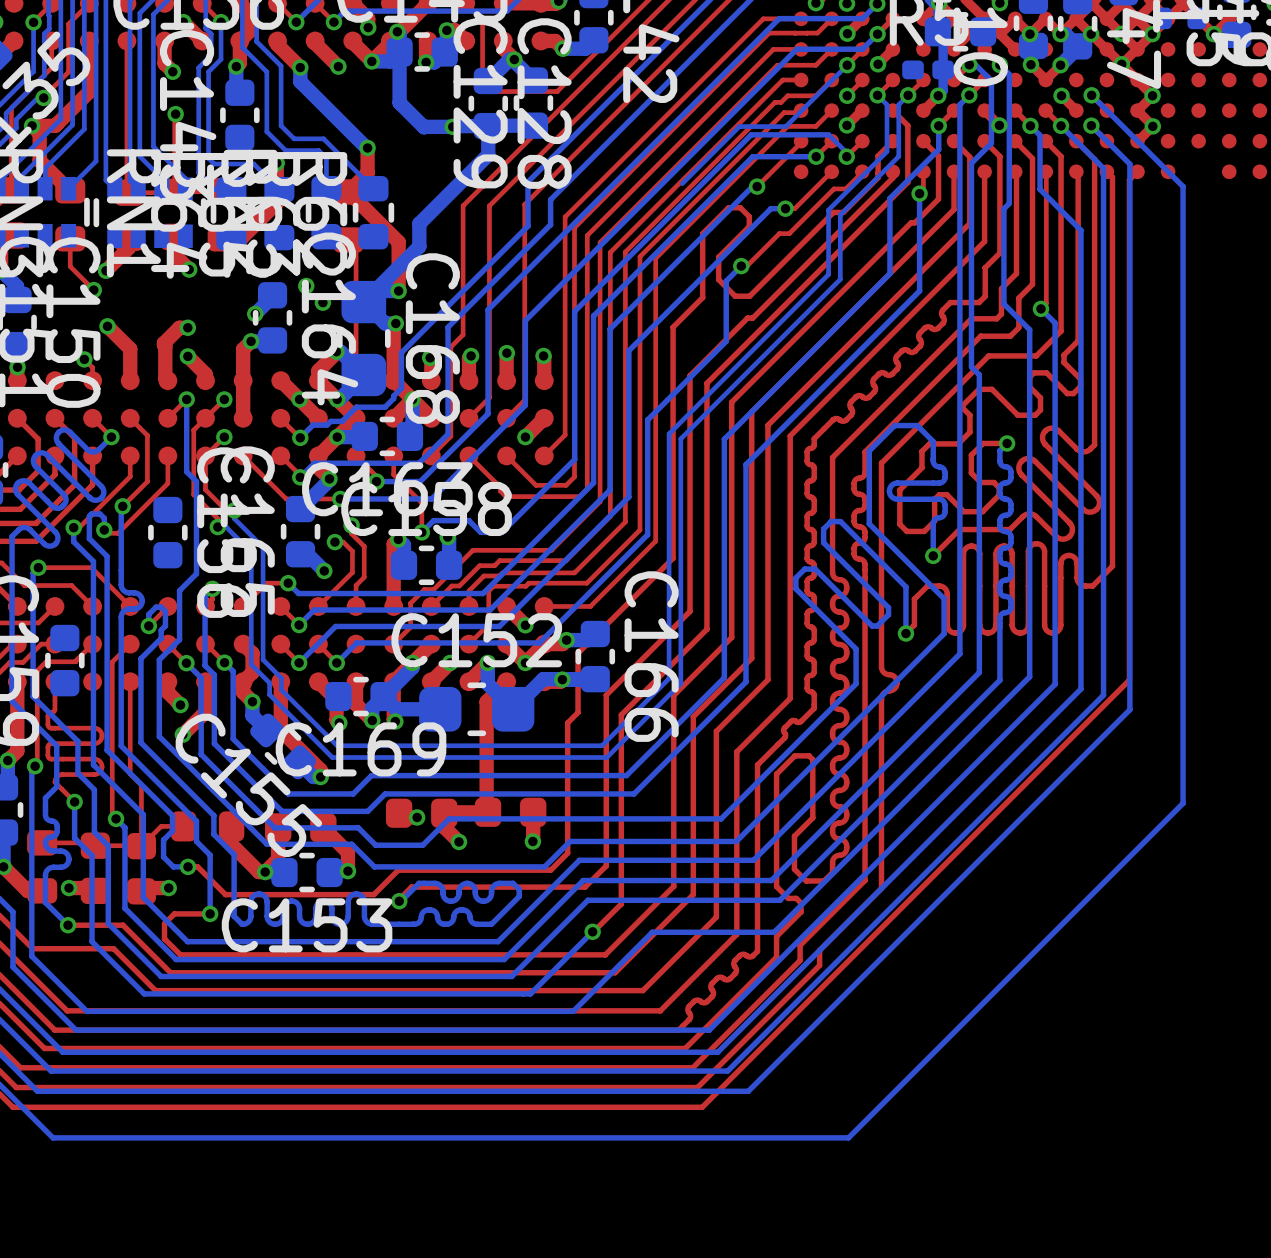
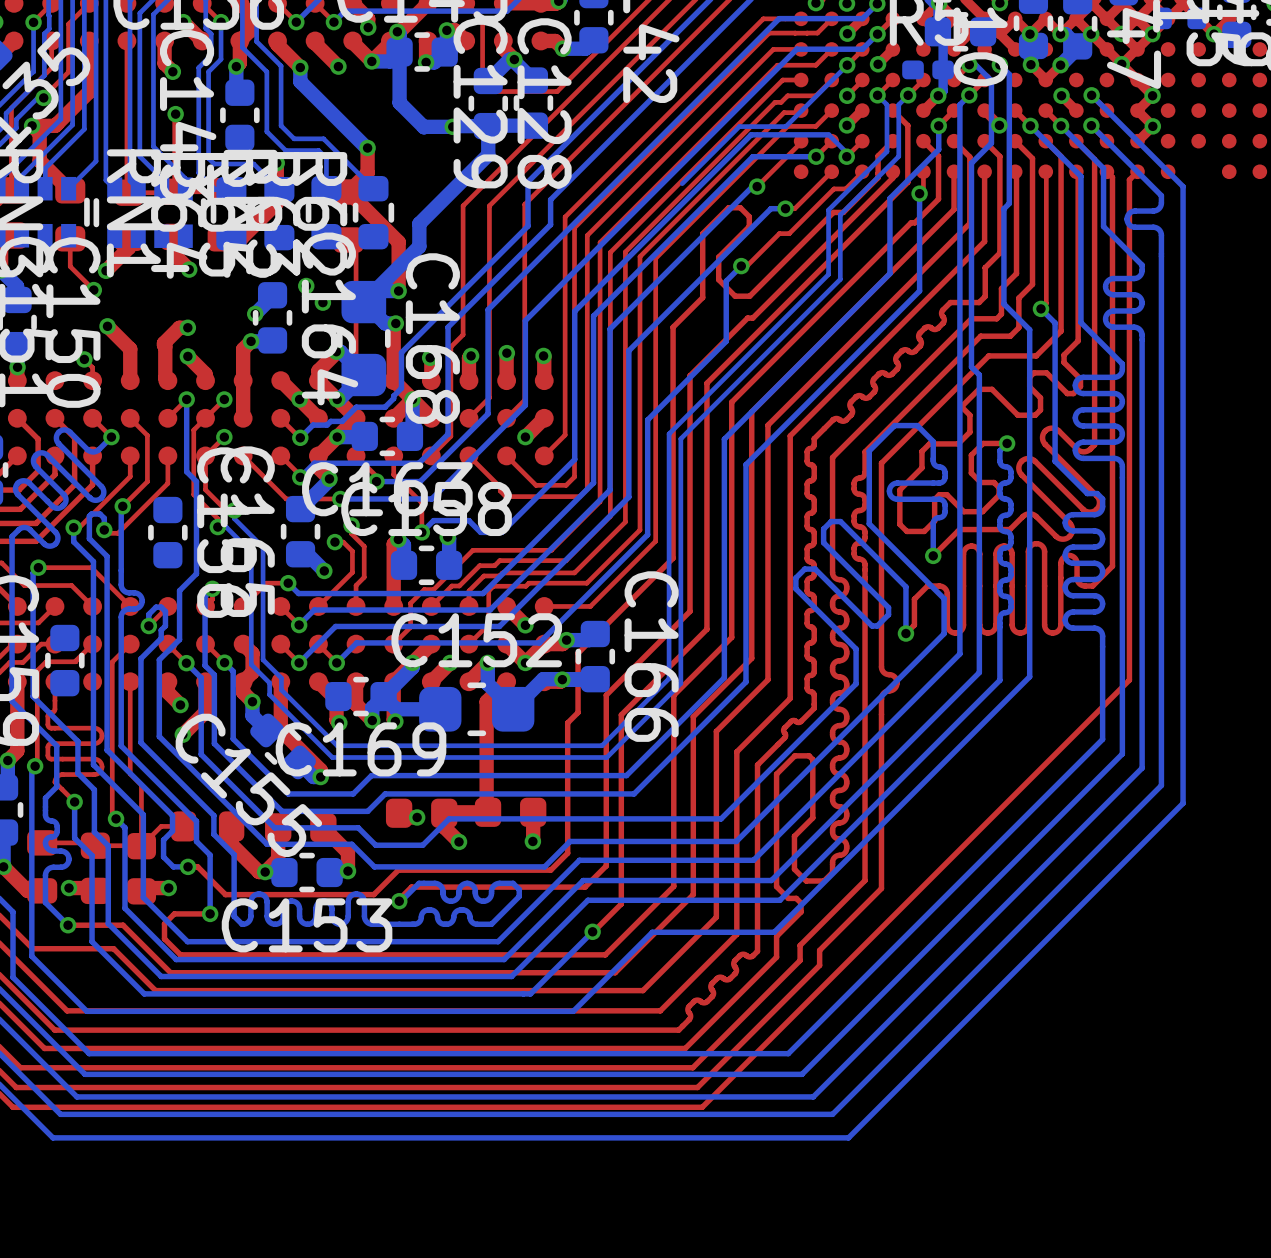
bottom track: (1040, 135) (1040, 189) (1080, 230) -> (1040, 135) (1080, 176) (1080, 230)
bottom track: (1129, 164) (1129, 709) (748, 1091) (37, 1091) -> (1129, 164) (1161, 195) (1161, 205) (1158, 209) (1133, 211) (1128, 214) (1127, 219) (1132, 226) (1155, 227) (1159, 230) (1161, 235) (1161, 785) (832, 1114) (60, 1114) (37, 1091)
bottom track: (1103, 226) (1103, 695) (727, 1071) (51, 1071) -> (1103, 226) (1142, 265) (1141, 272) (1138, 277) (1111, 278) (1107, 281) (1105, 286) (1110, 294) (1136, 295) (1142, 301) (1141, 306) (1137, 310) (1111, 311) (1107, 314) (1105, 319) (1110, 326) (1136, 327) (1142, 334) (1142, 768) (813, 1096) (76, 1096) (51, 1071)
bottom track: (1080, 322) (1080, 689) (717, 1052) (62, 1052) -> (1080, 322) (1122, 363) (1121, 372) (1117, 376) (1081, 377) (1077, 380) (1075, 385) (1077, 390) (1081, 393) (1115, 393) (1120, 395) (1122, 400) (1121, 405) (1117, 409) (1081, 410) (1077, 412) (1075, 417) (1077, 422) (1081, 425) (1117, 426) (1122, 433) (1120, 439) (1115, 442) (1081, 442) (1077, 445) (1075, 450) (1077, 455) (1081, 458) (1115, 458) (1120, 460) (1122, 465) (1122, 753) (801, 1074) (84, 1074) (62, 1052)
bottom track: (1055, 461) (1055, 684) (709, 1030) (76, 1030) (13, 967) -> (1055, 461) (1087, 493) (1097, 493) (1102, 498) (1102, 508) (1098, 513) (1071, 514) (1066, 517) (1065, 522) (1070, 530) (1096, 531) (1102, 537) (1101, 543) (1097, 546) (1071, 547) (1066, 550) (1065, 555) (1066, 560) (1071, 563) (1095, 563) (1100, 566) (1102, 572) (1098, 578) (1071, 579) (1066, 582) (1065, 587) (1066, 592) (1071, 595) (1098, 596) (1102, 601) (1101, 606) (1095, 611) (1070, 612) (1065, 620) (1070, 627) (1096, 628) (1102, 634) (1102, 739) (788, 1053) (89, 1053) (13, 977) (13, 967)

